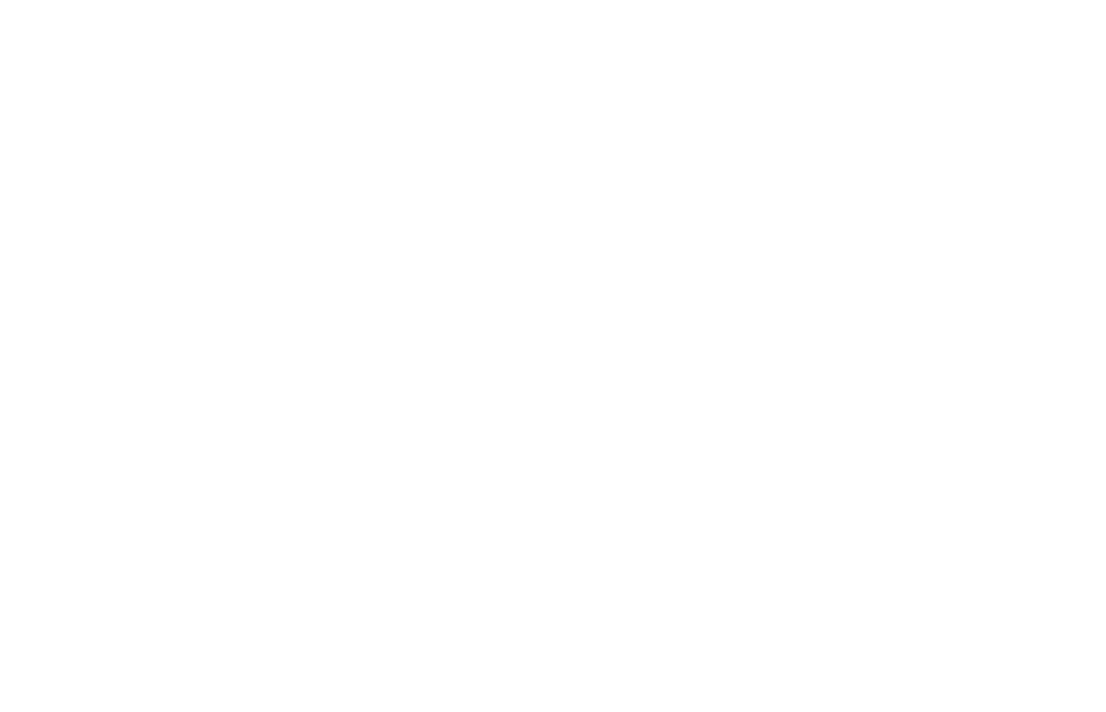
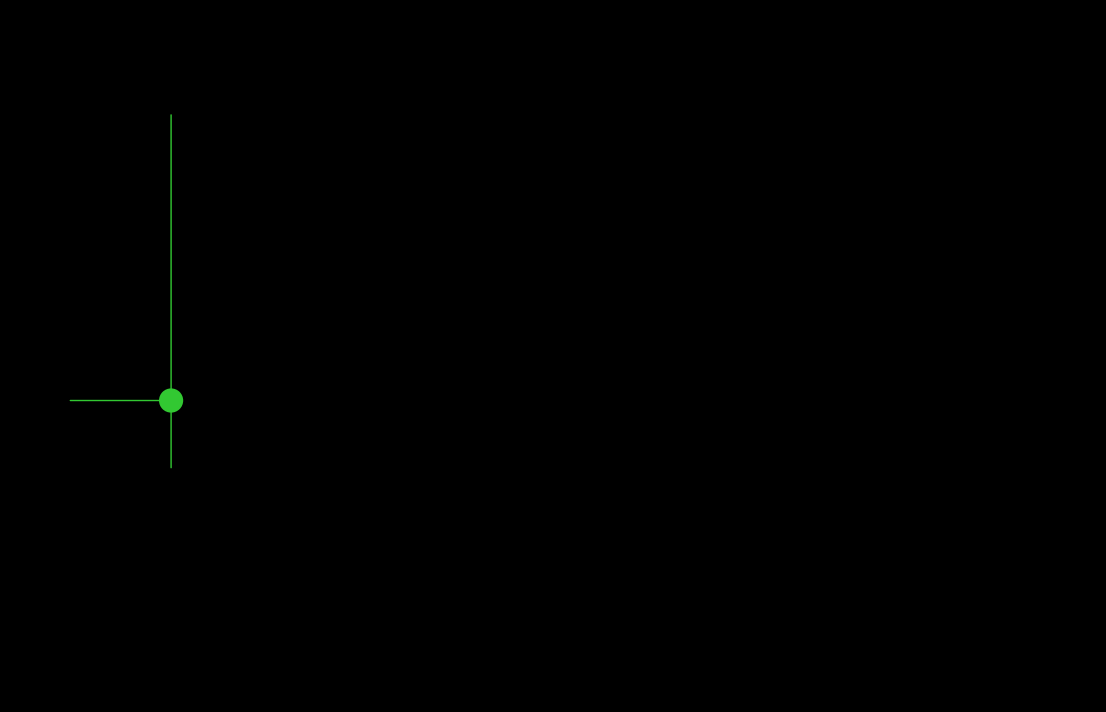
wire: none -> (171, 114) (171, 467)
wire: none -> (70, 400) (171, 400)
junction: none -> (171, 400)

